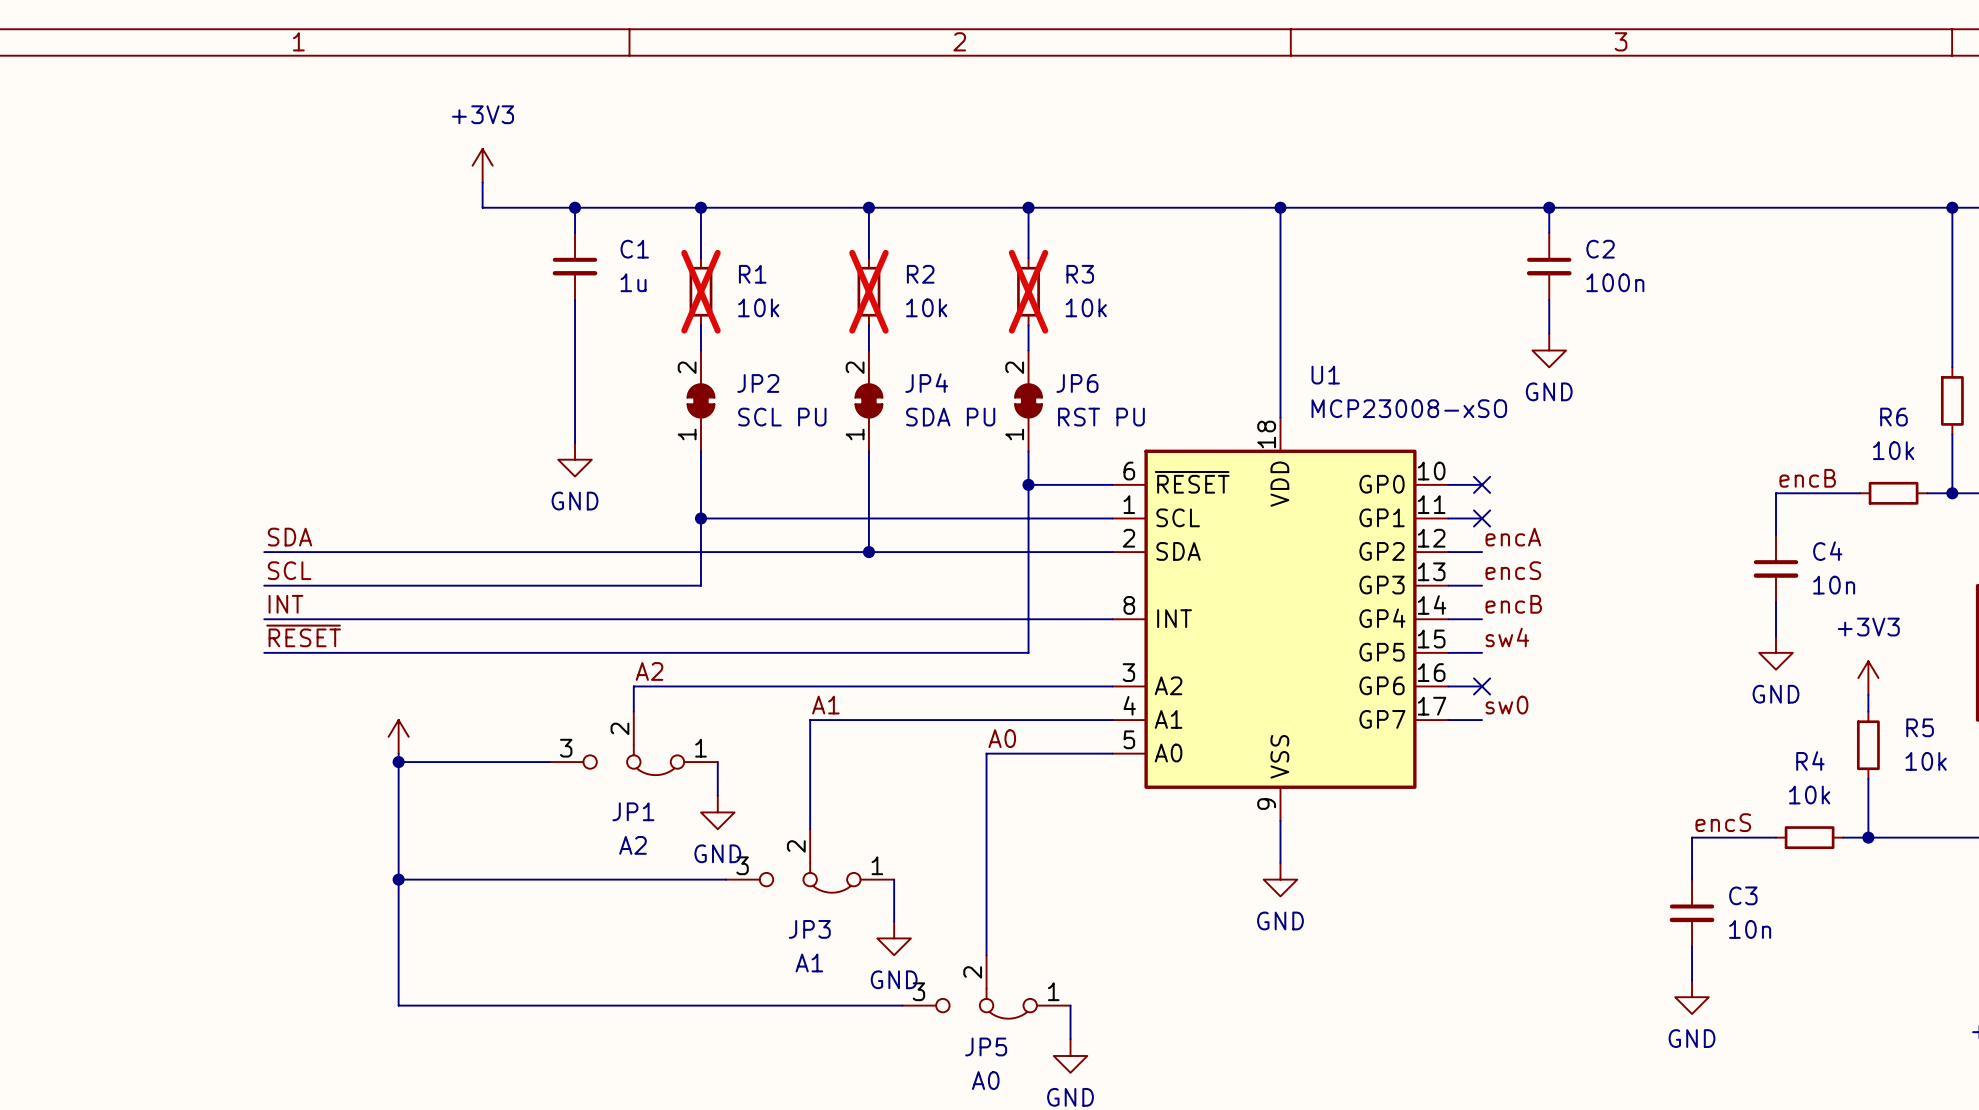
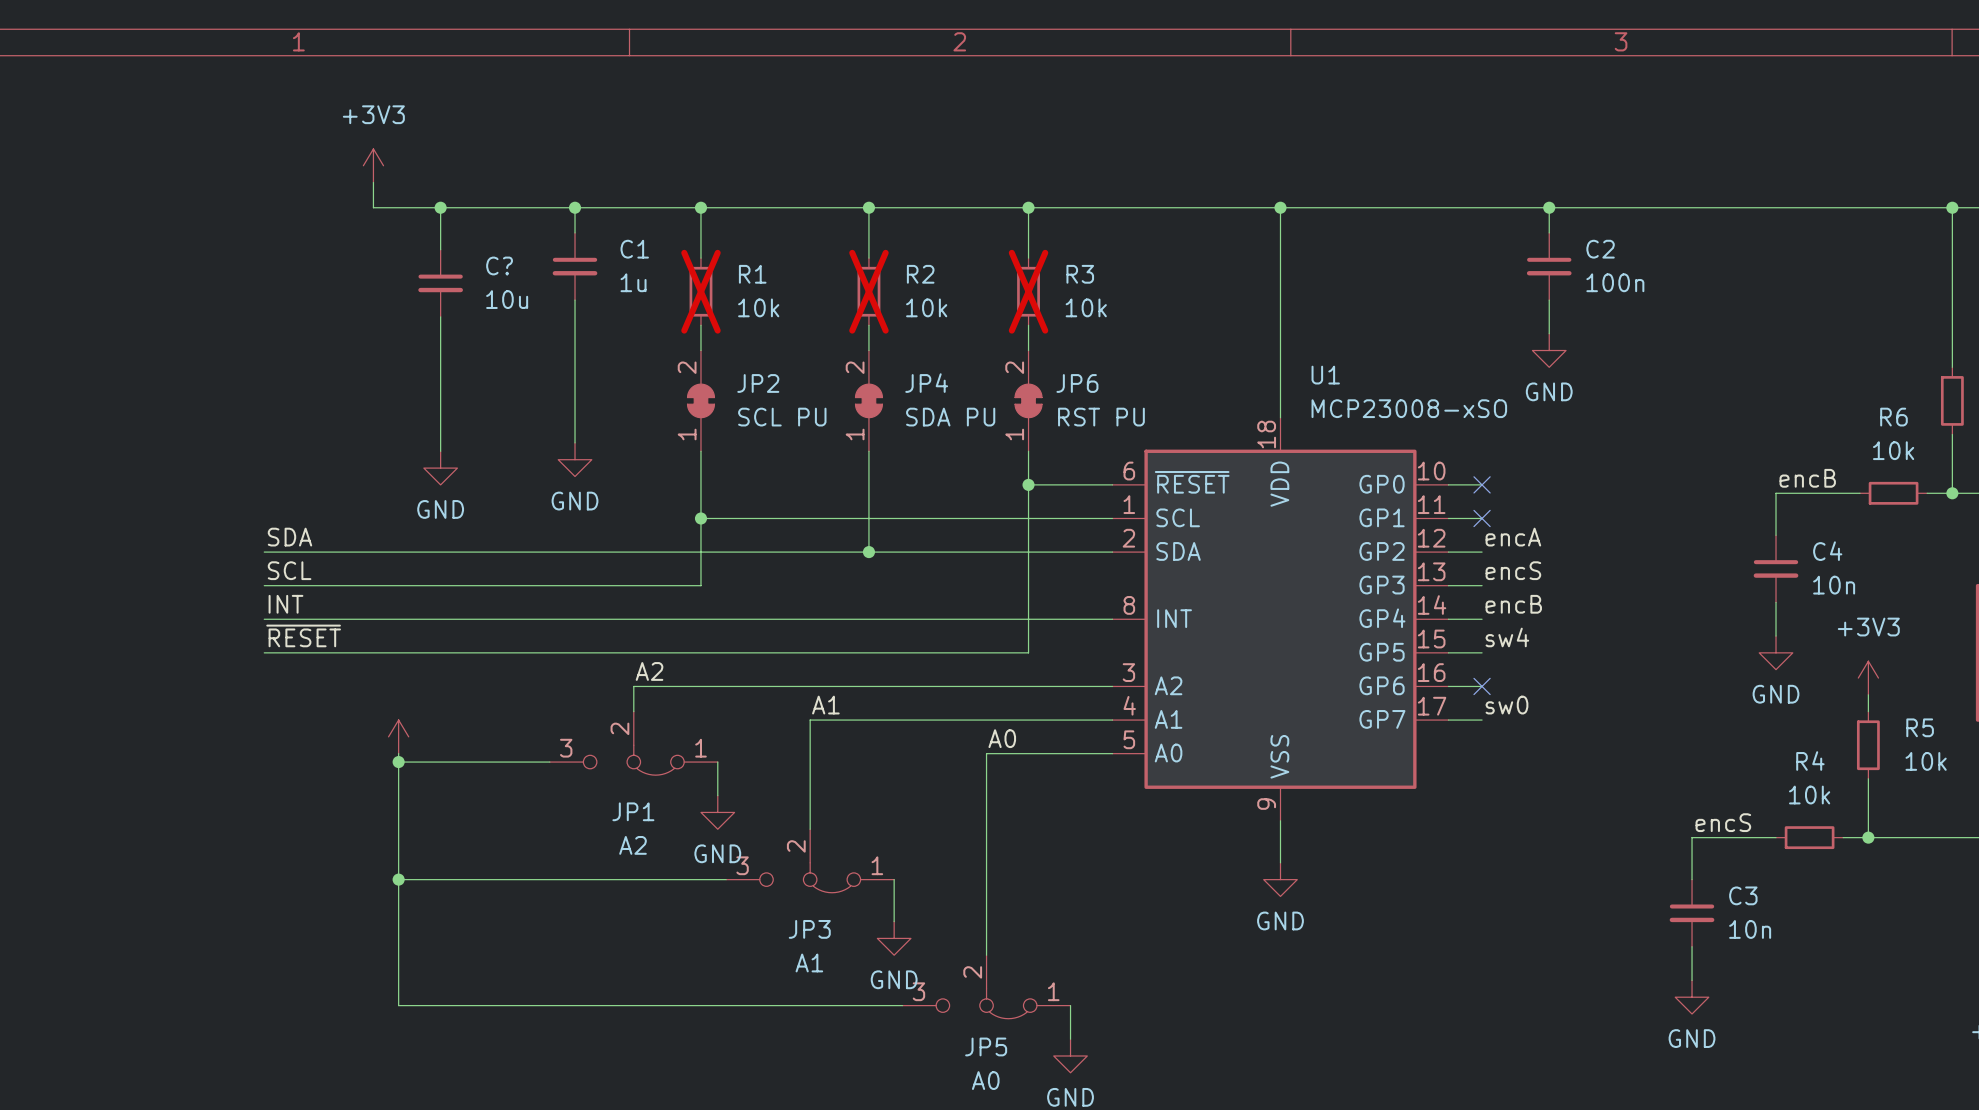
power symbol position: +3V3 (482, 165) -> +3V3 (373, 165)
wire: (482, 182) (482, 207) -> (373, 182) (373, 207) (482, 207)
wire: none -> (440, 207) (440, 249)
junction: none -> (440, 207)
C?: none -> 10u (440, 283)
wire: none -> (440, 316) (440, 451)
power symbol: none -> GND (440, 468)

